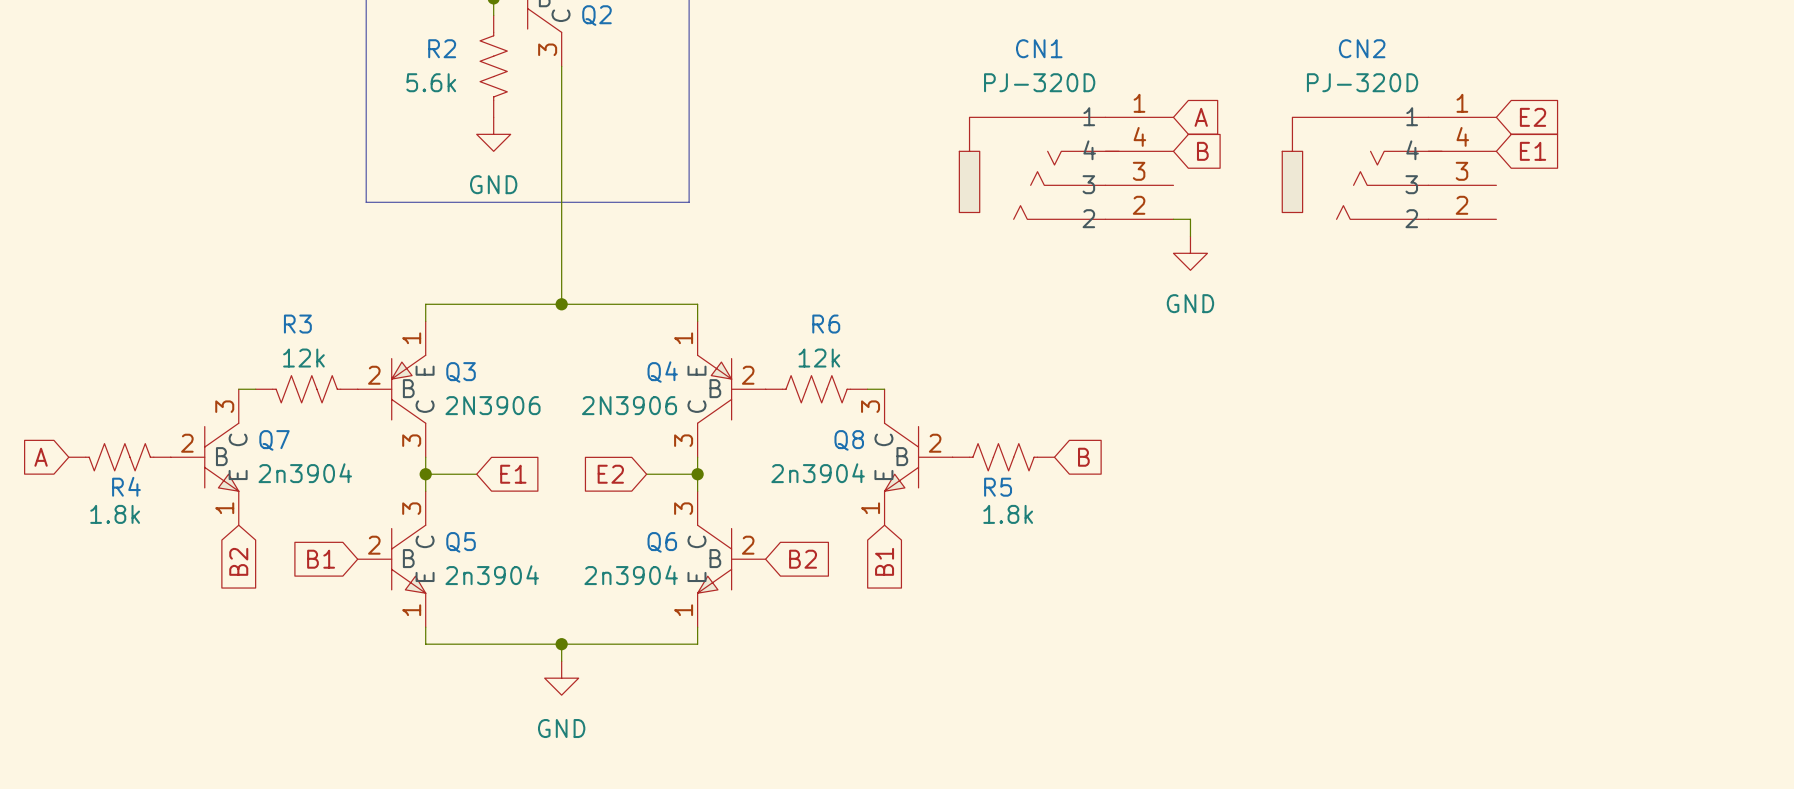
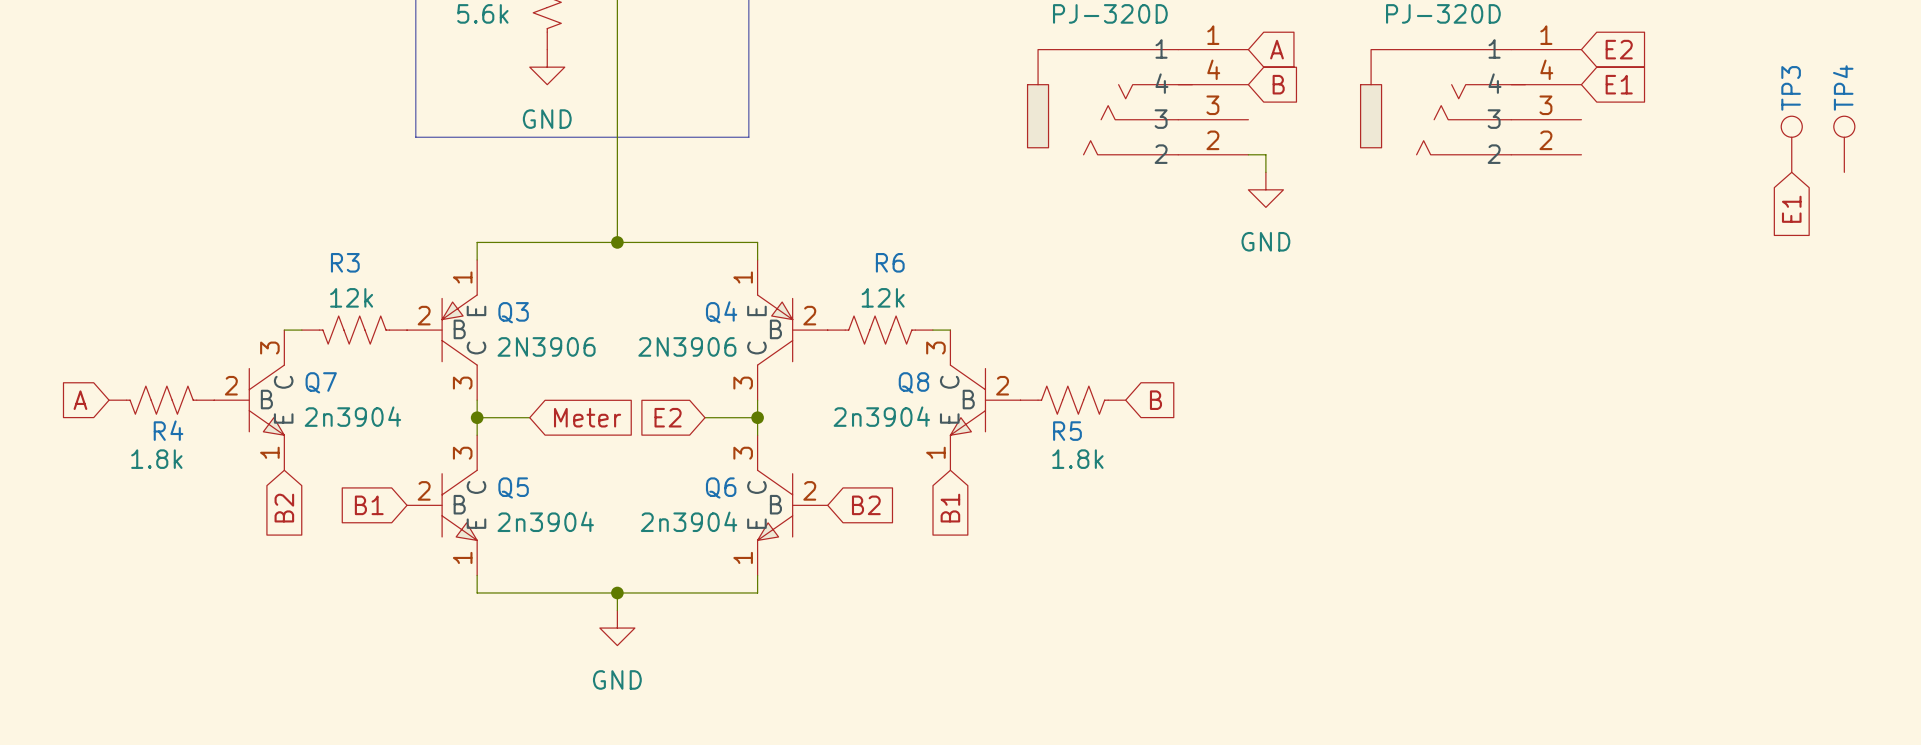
TP3: none -> (1791, 144)
TP4: none -> (1844, 144)
global label: none -> E1 (1791, 209)
global label: E1 (513, 474) -> Meter (587, 417)

